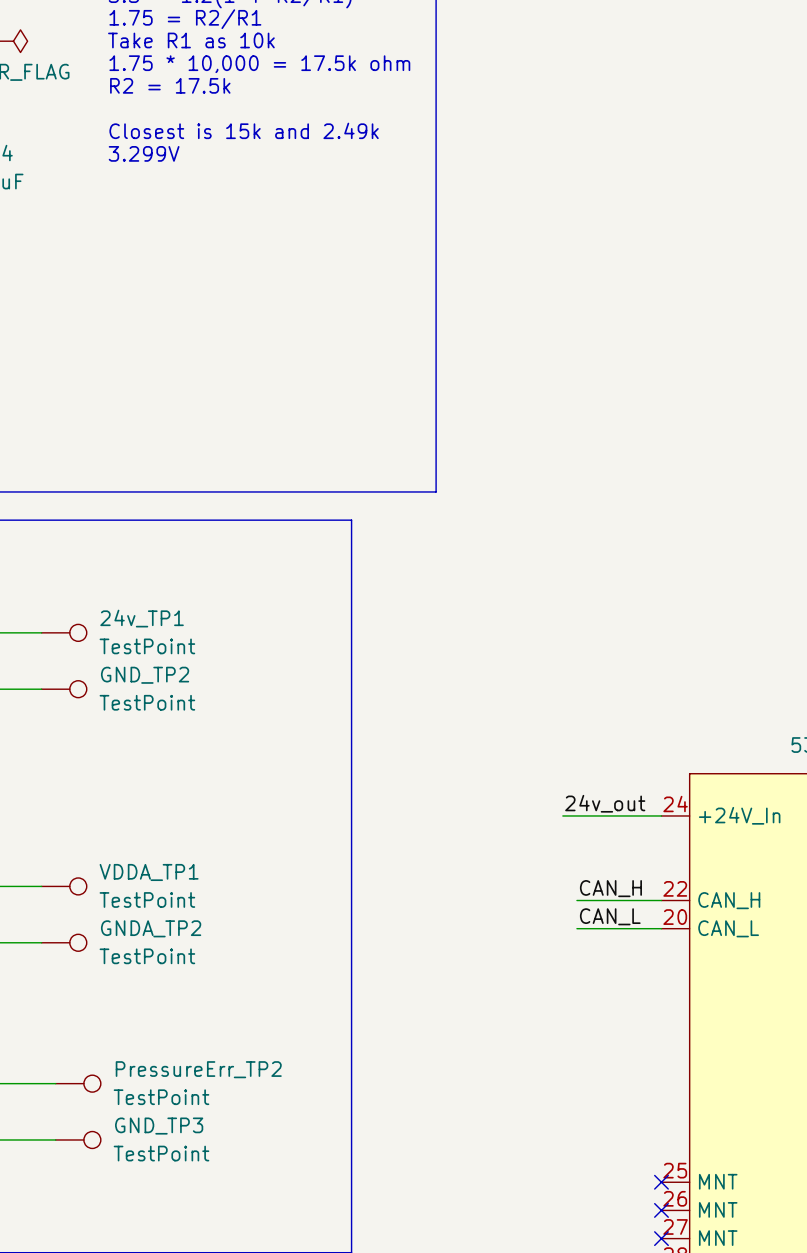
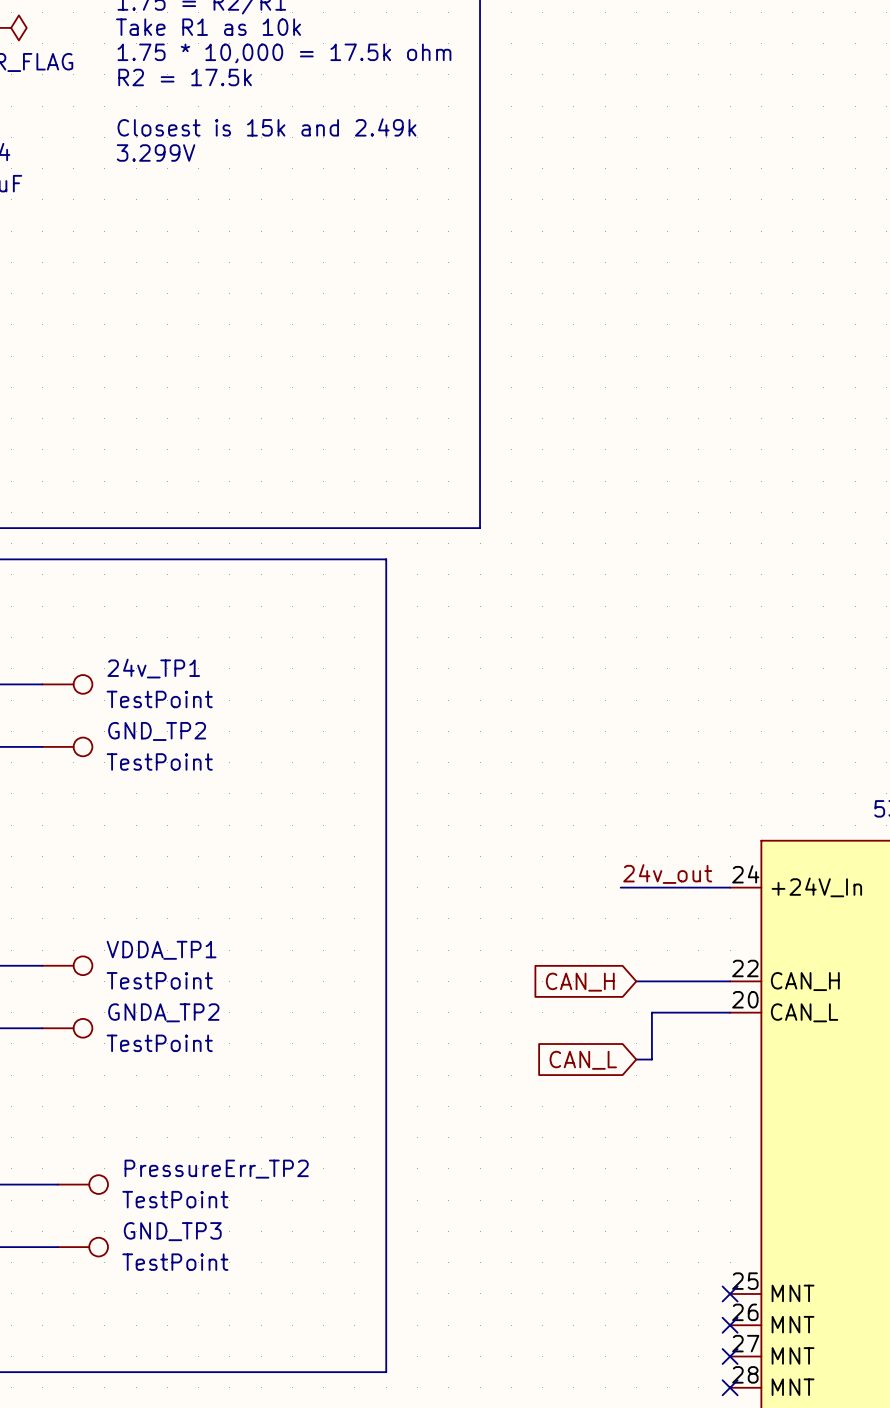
label: CAN_H (610, 888) -> none
global label: none -> CAN_H (580, 982)
label: CAN_L (610, 916) -> none
wire: (576, 928) (591, 928) -> (636, 1059) (651, 1059) (651, 1012)
global label: none -> CAN_L (583, 1060)

